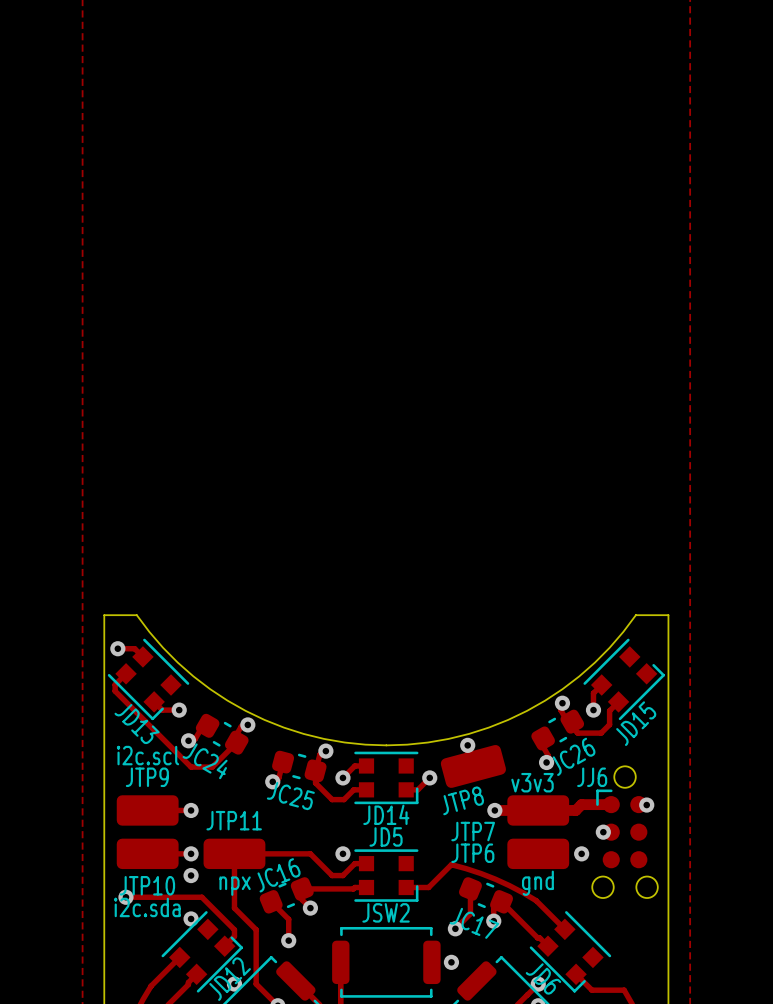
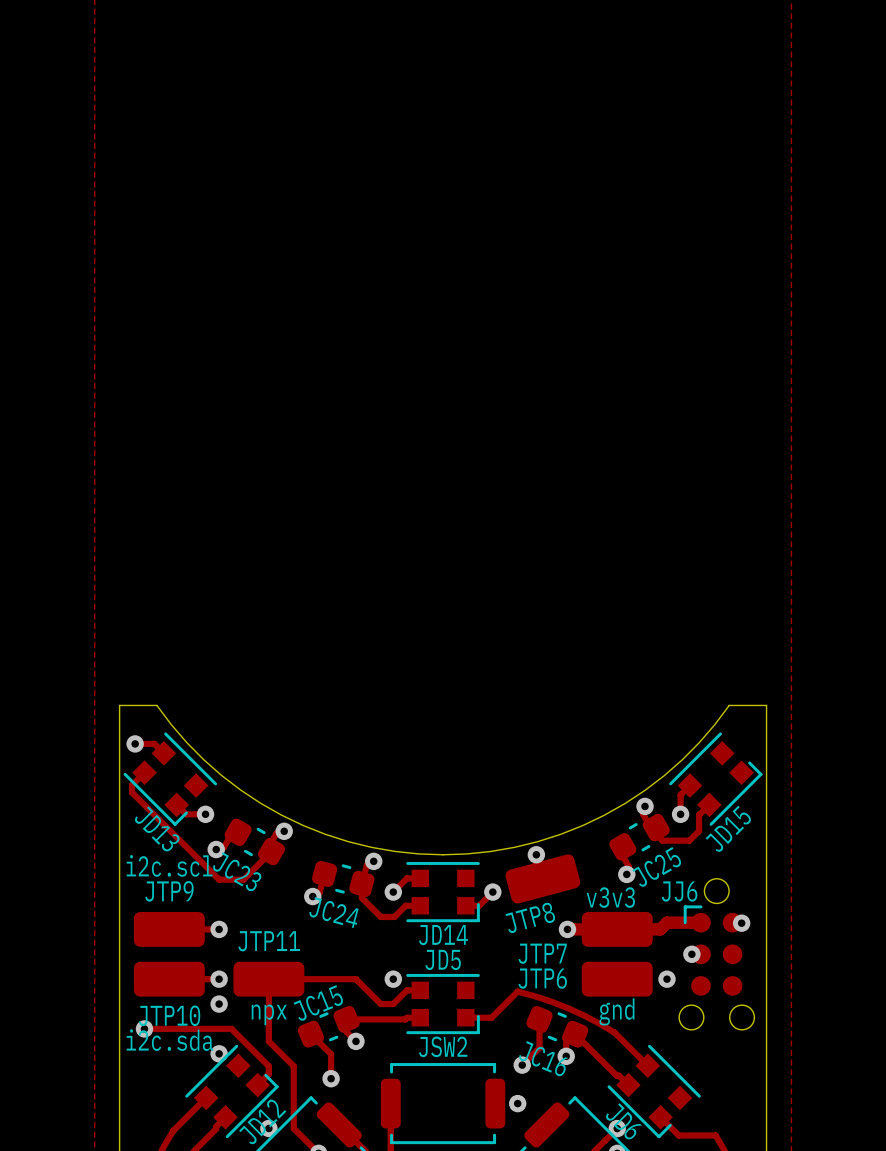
JC26 name: JC26 (574, 756) -> JC25 (656, 867)
JC24 name: JC24 (205, 761) -> JC23 (237, 871)
JC25 name: JC25 (290, 796) -> JC24 (333, 912)
JC16 name: JC16 (279, 875) -> JC15 (318, 1003)
JC17 name: JC17 (474, 923) -> JC16 (543, 1058)

